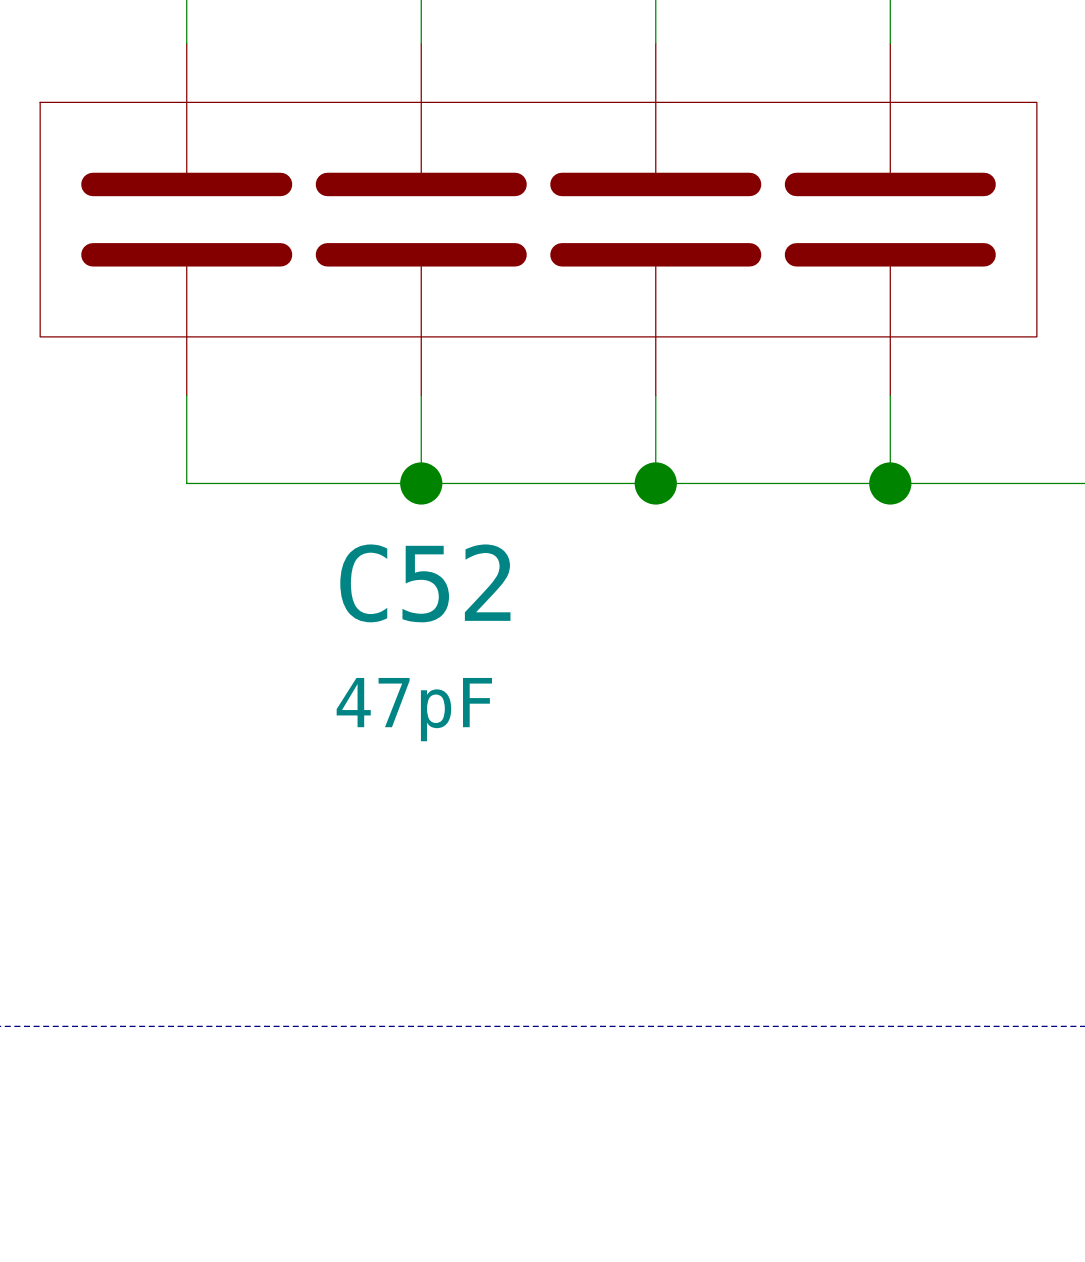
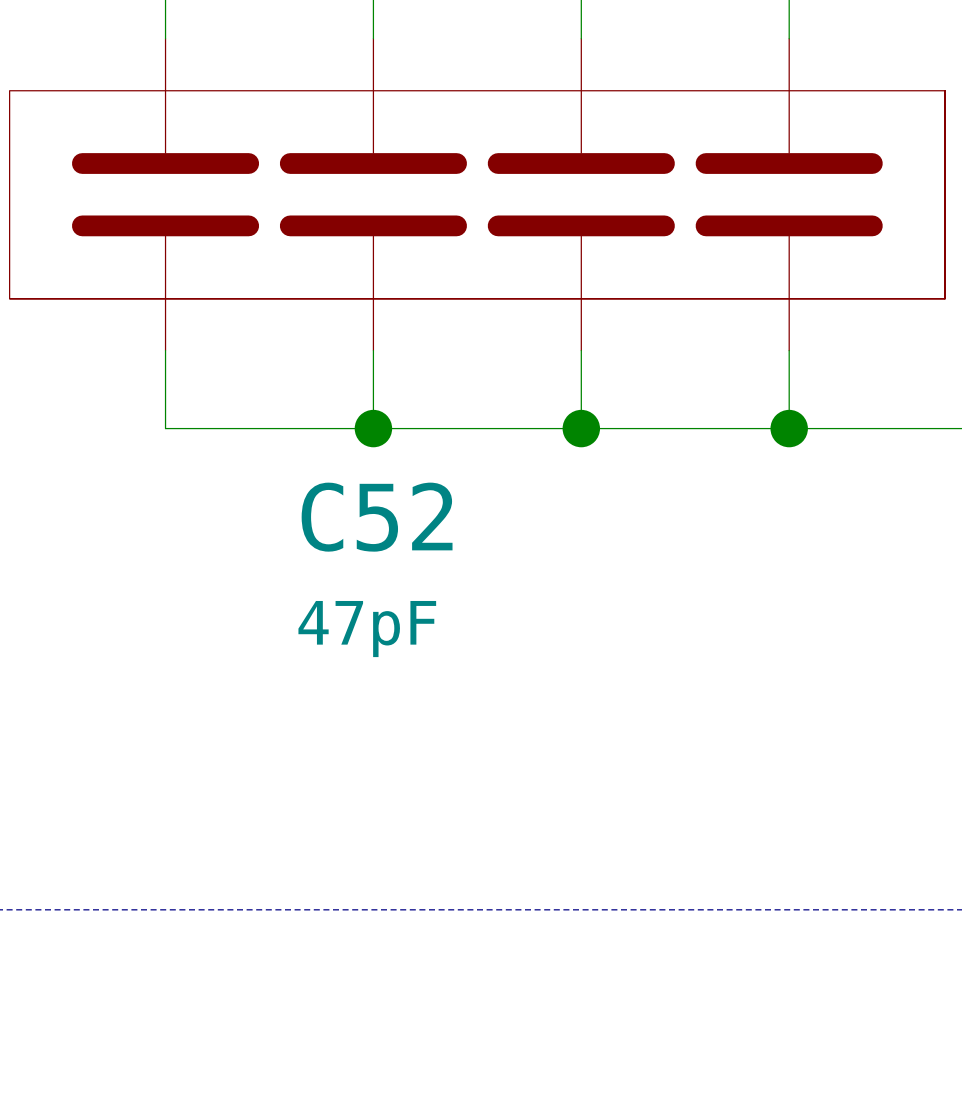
C52 symbol: [40, 43, 1037, 396] -> [9, 38, 946, 351]

